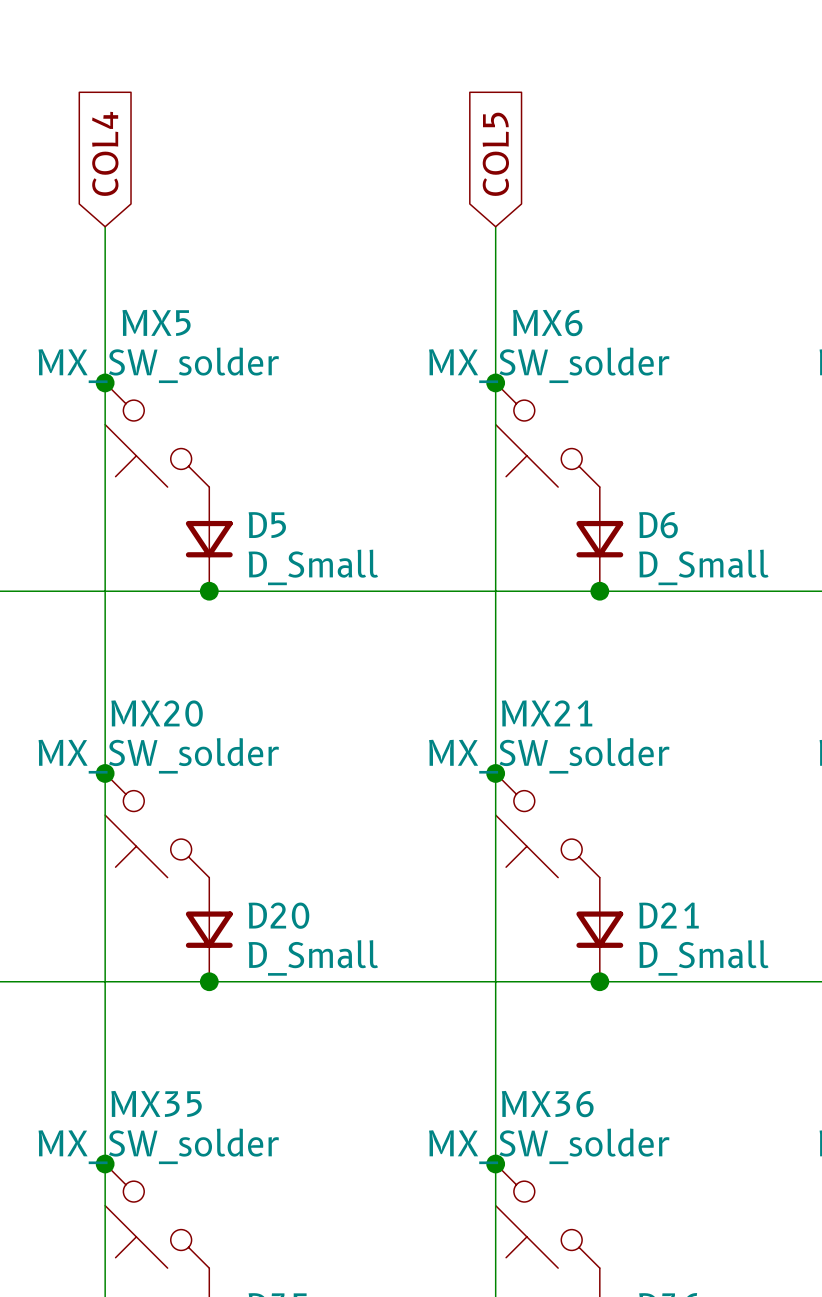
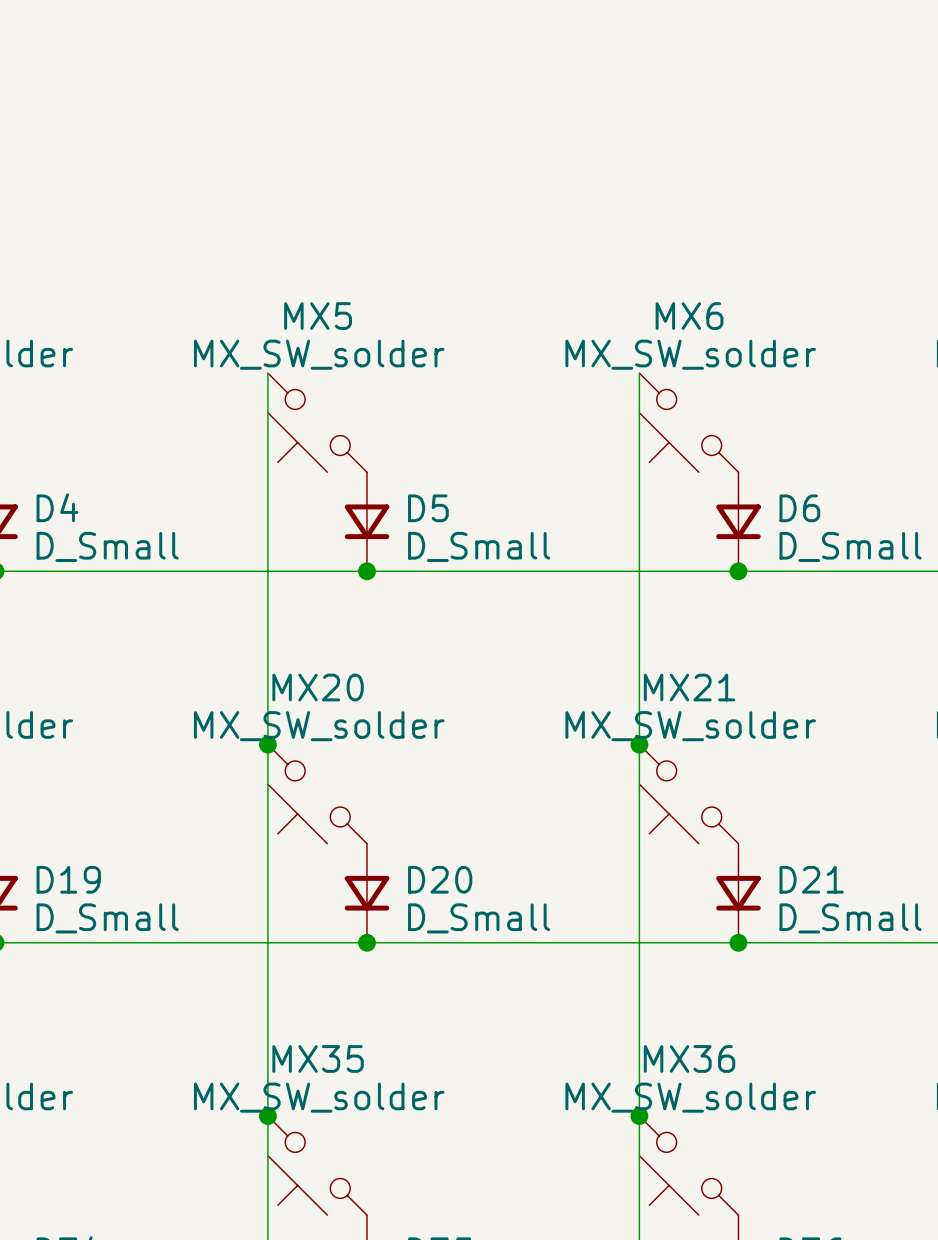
global label: COL4 (105, 153) -> none
global label: COL5 (495, 154) -> none
wire: (105, 226) (105, 382) -> none
wire: (495, 226) (495, 382) -> none
junction: (105, 382) -> none
junction: (495, 382) -> none

